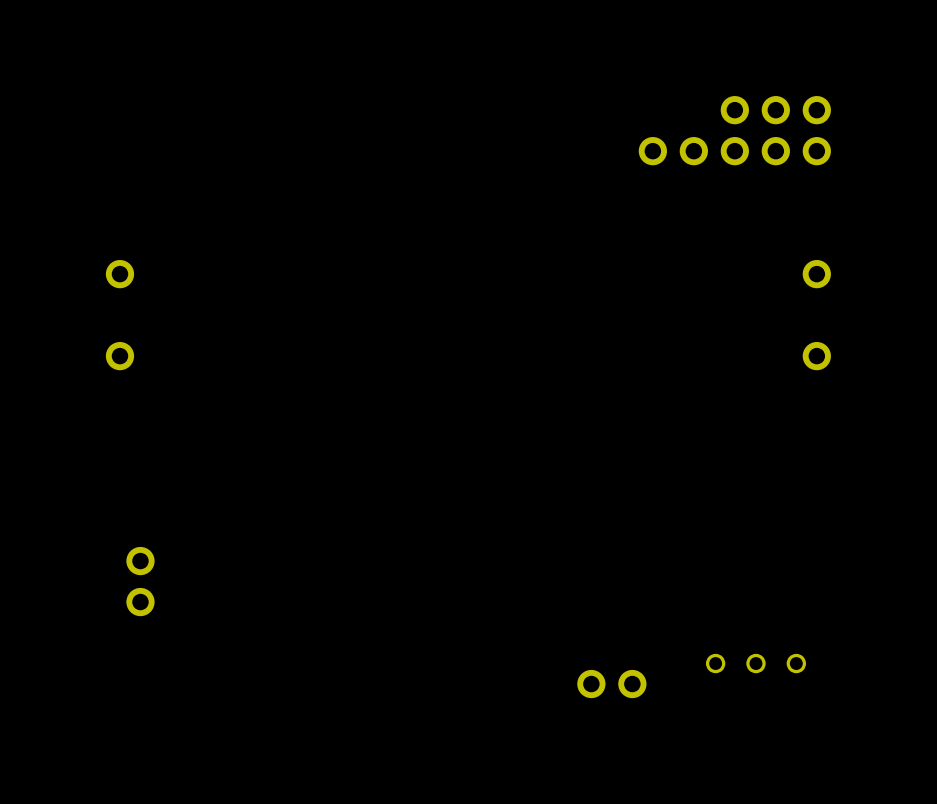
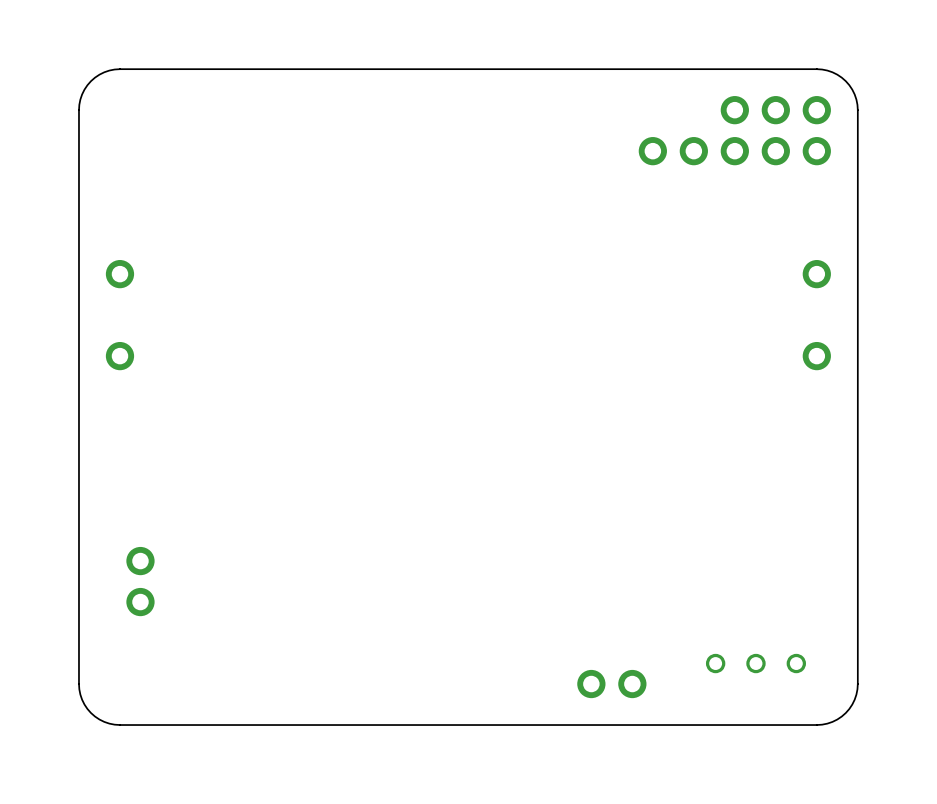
board edge: none -> (816, 69) (119, 69) (104, 72) (90, 81) (82, 94) (78, 110) (78, 684) (82, 699) (90, 713) (104, 721) (119, 725) (816, 725) (832, 721) (845, 713) (854, 699) (857, 684) (857, 110) (854, 94) (845, 81) (832, 72) (816, 69)

